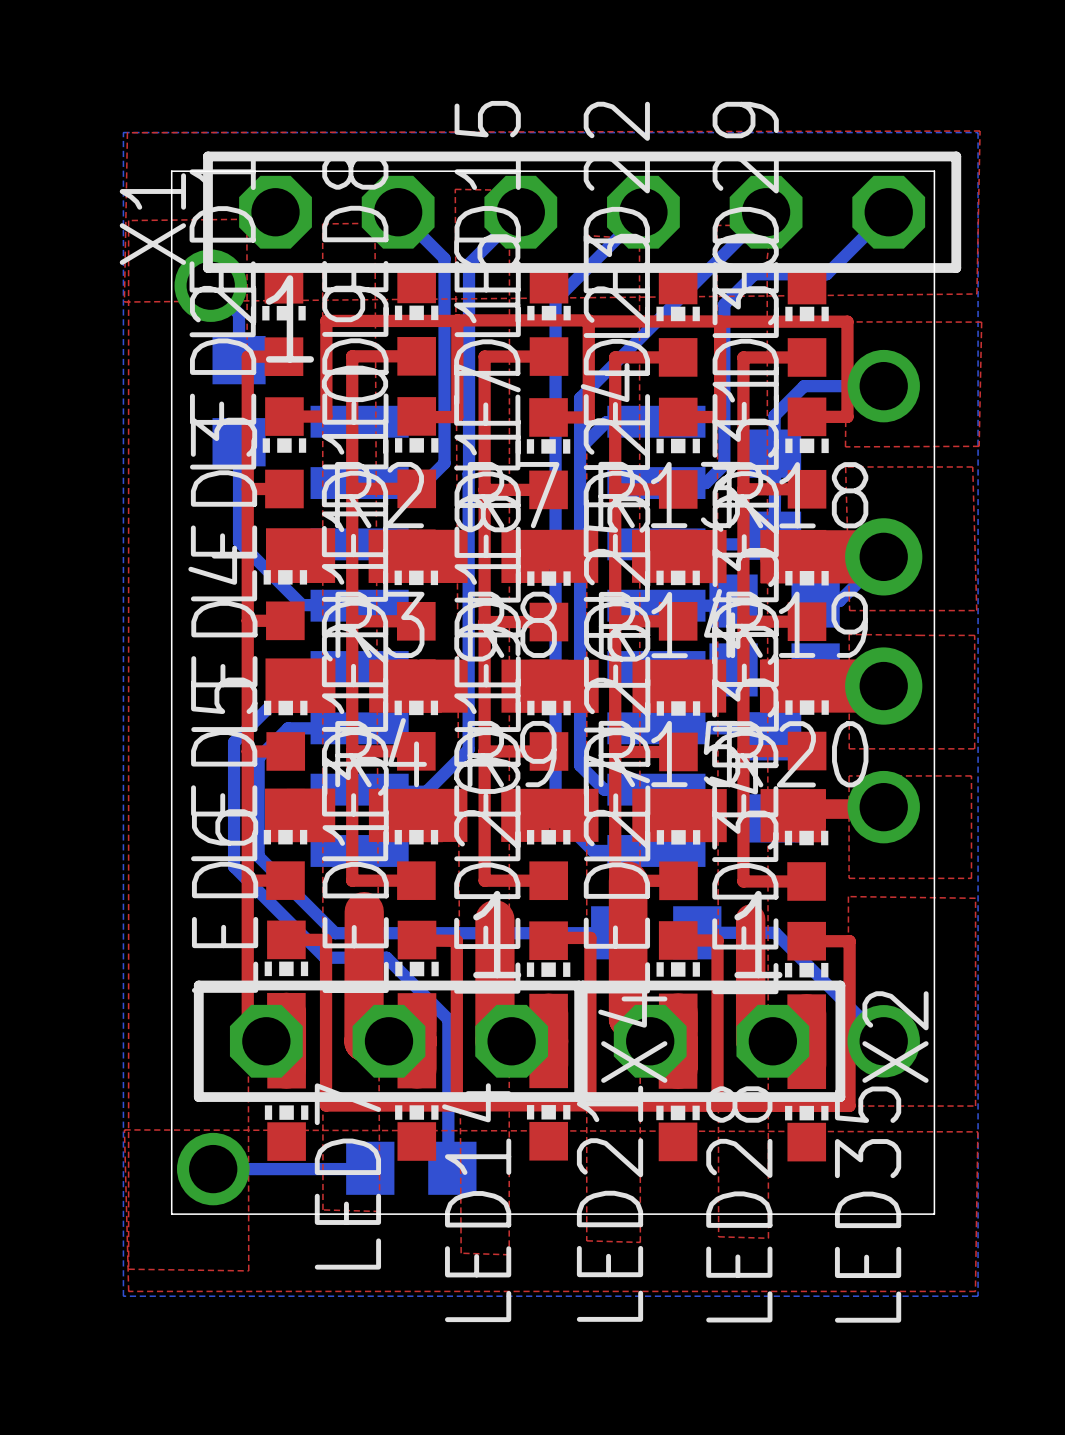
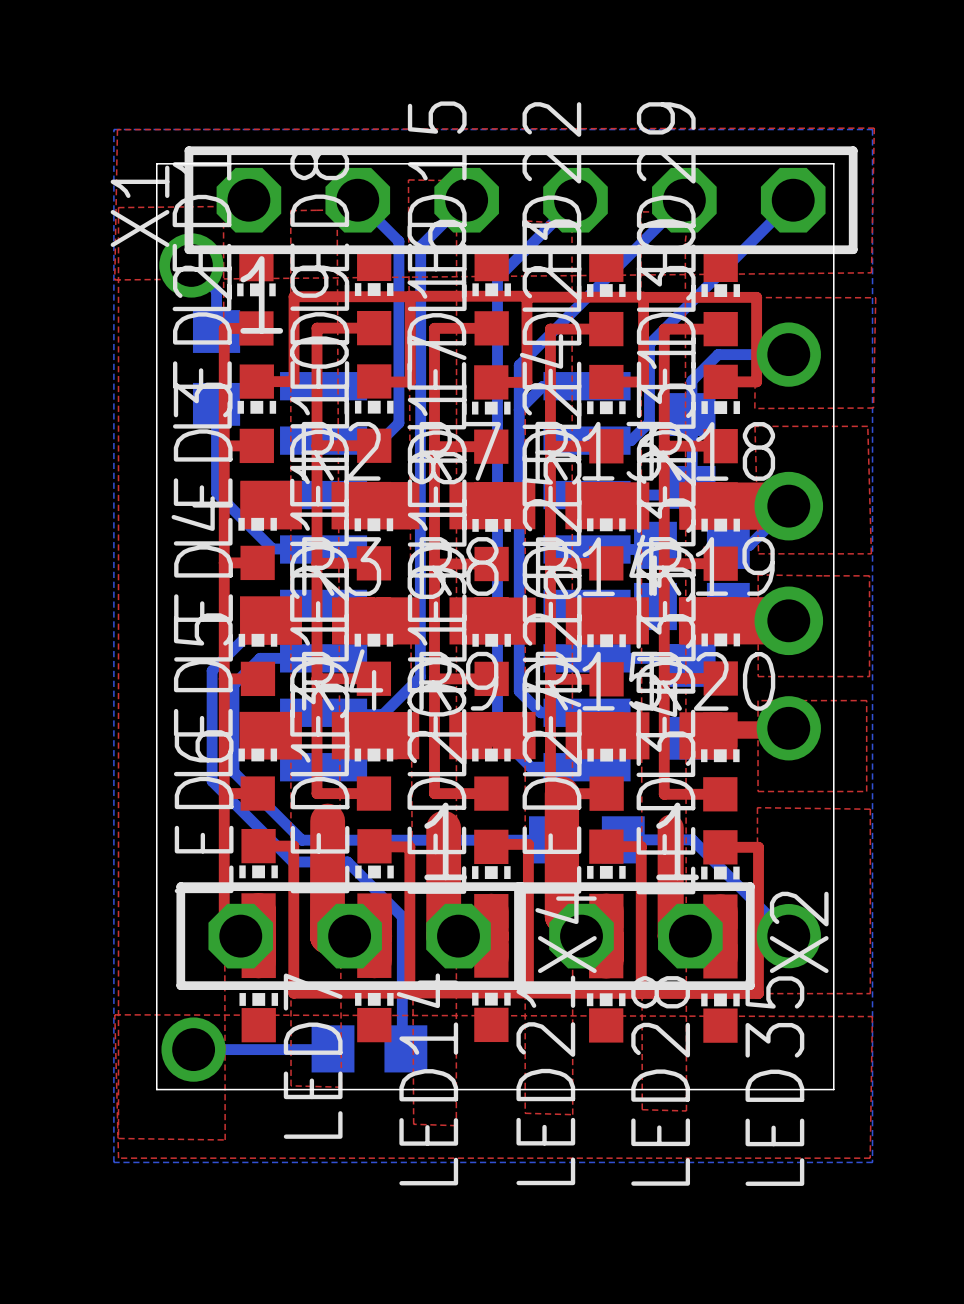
bottom track: (888, 212) (826, 274) (754, 274) (724, 304) (724, 464) (705, 483) -> (793, 200) (649, 344) (649, 422) (630, 440)

